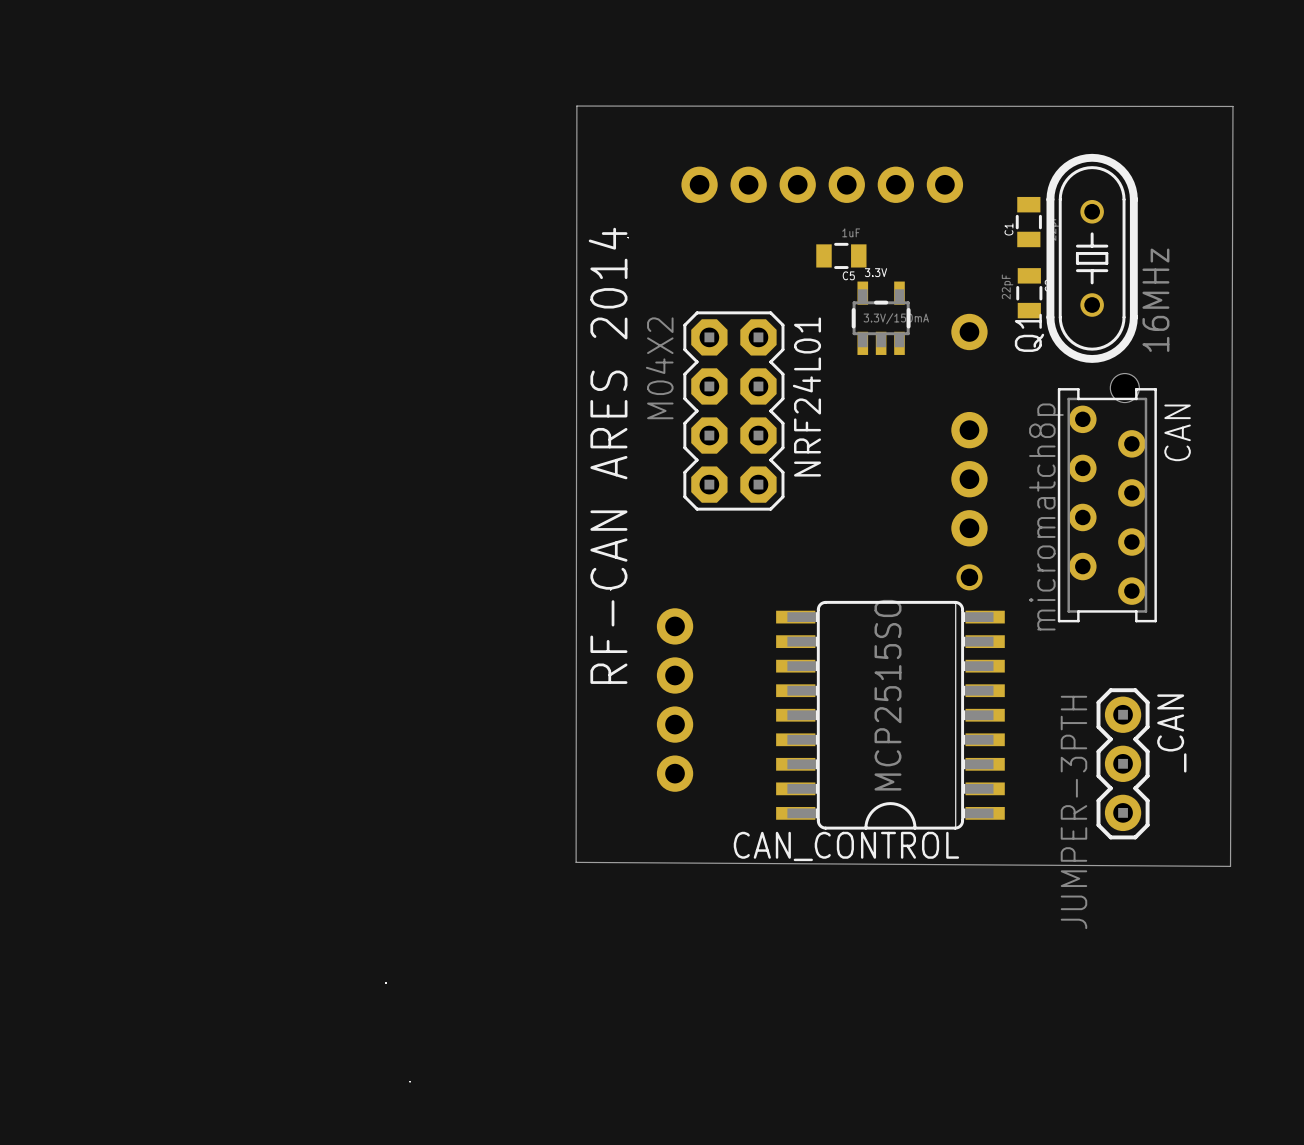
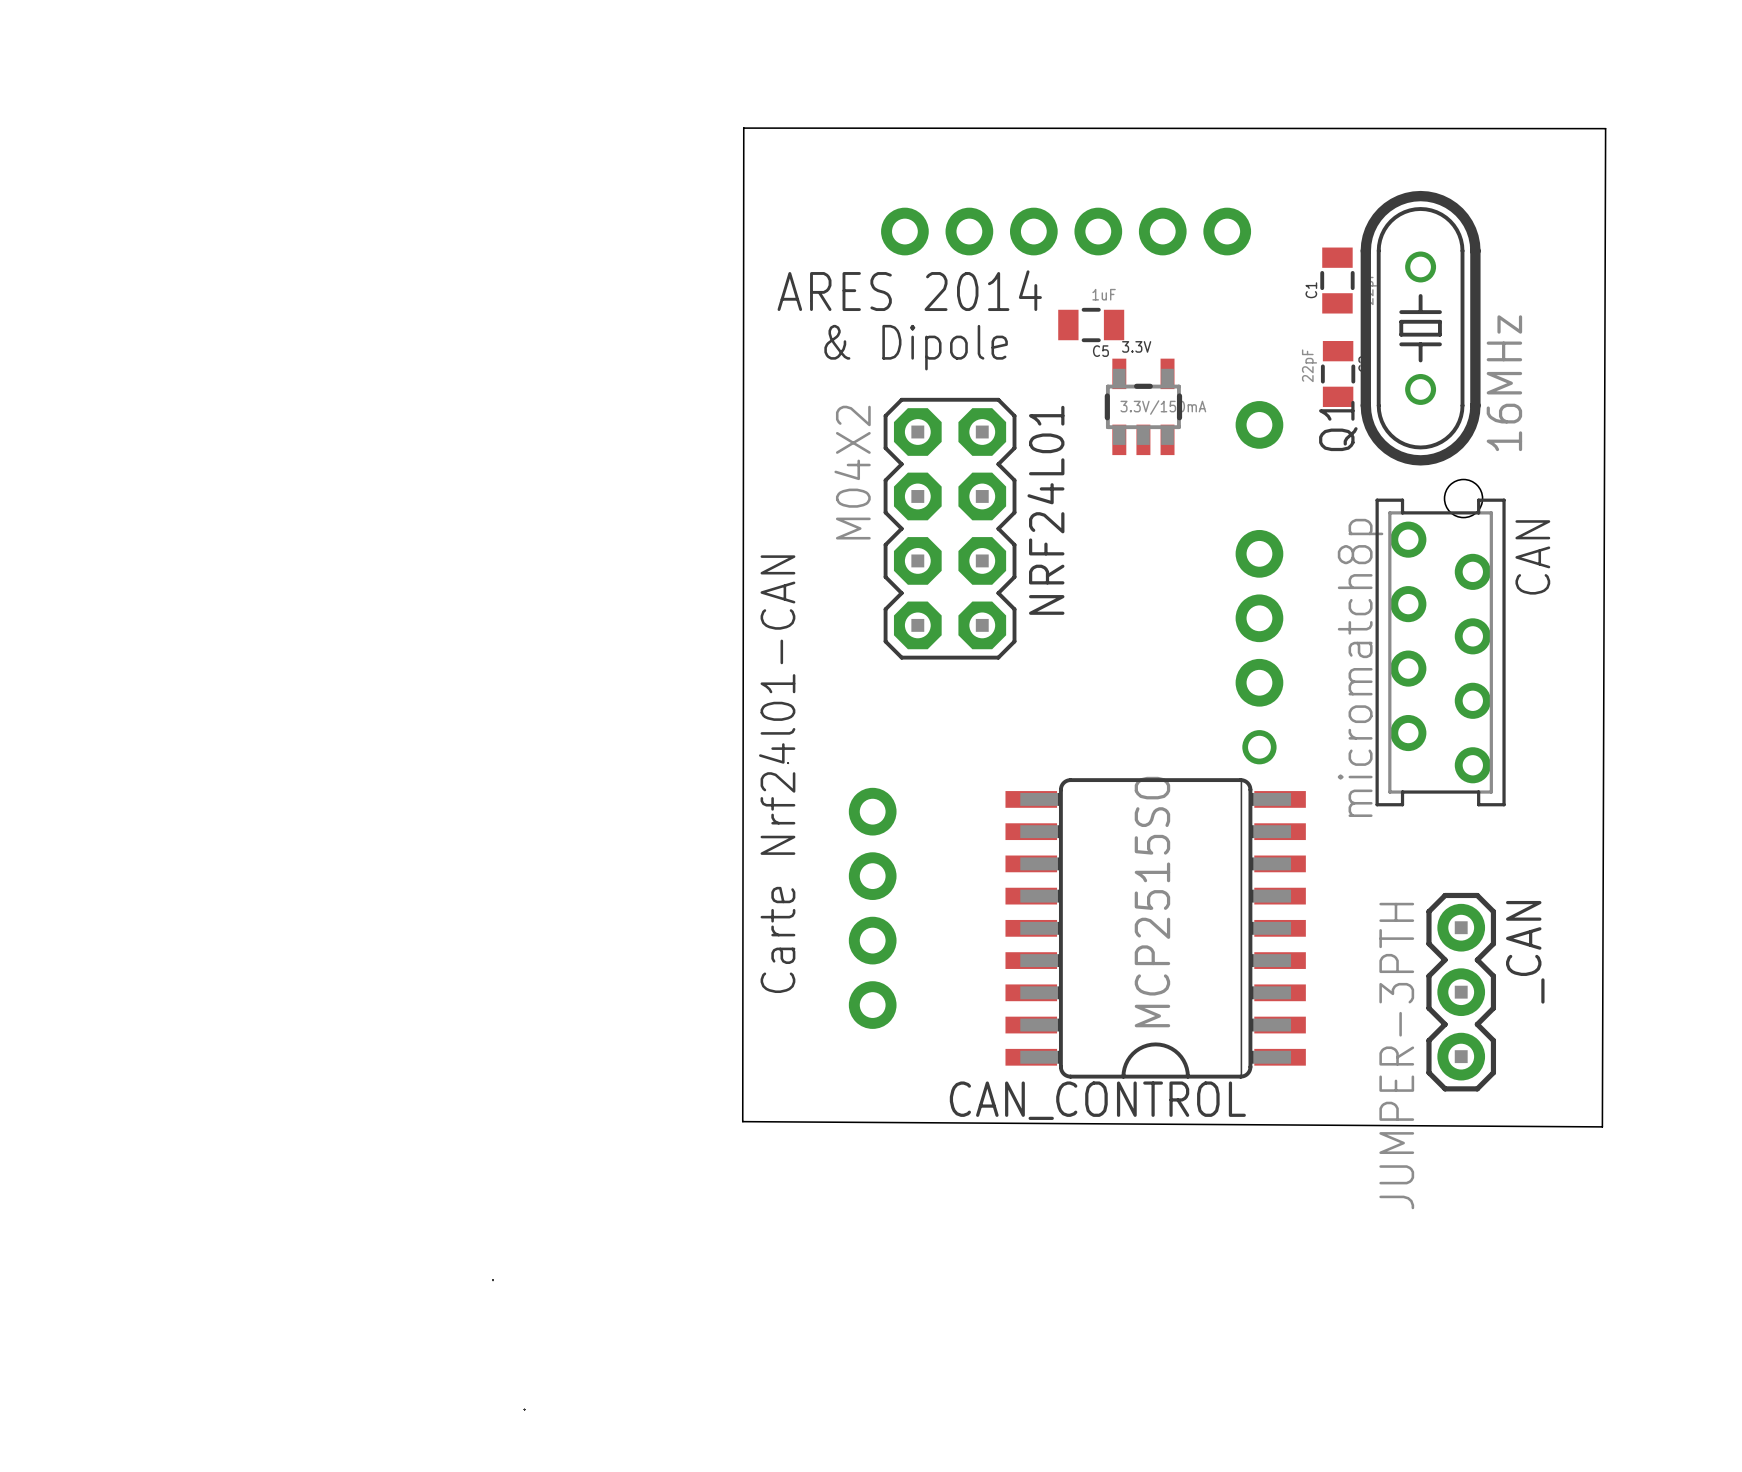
text: none -> & Dipole (916, 347)
text: RF-CAN ARES 2014 (608, 455) -> ARES 2014 (909, 290)
text: none -> Carte Nrf24l01-CAN (777, 774)

